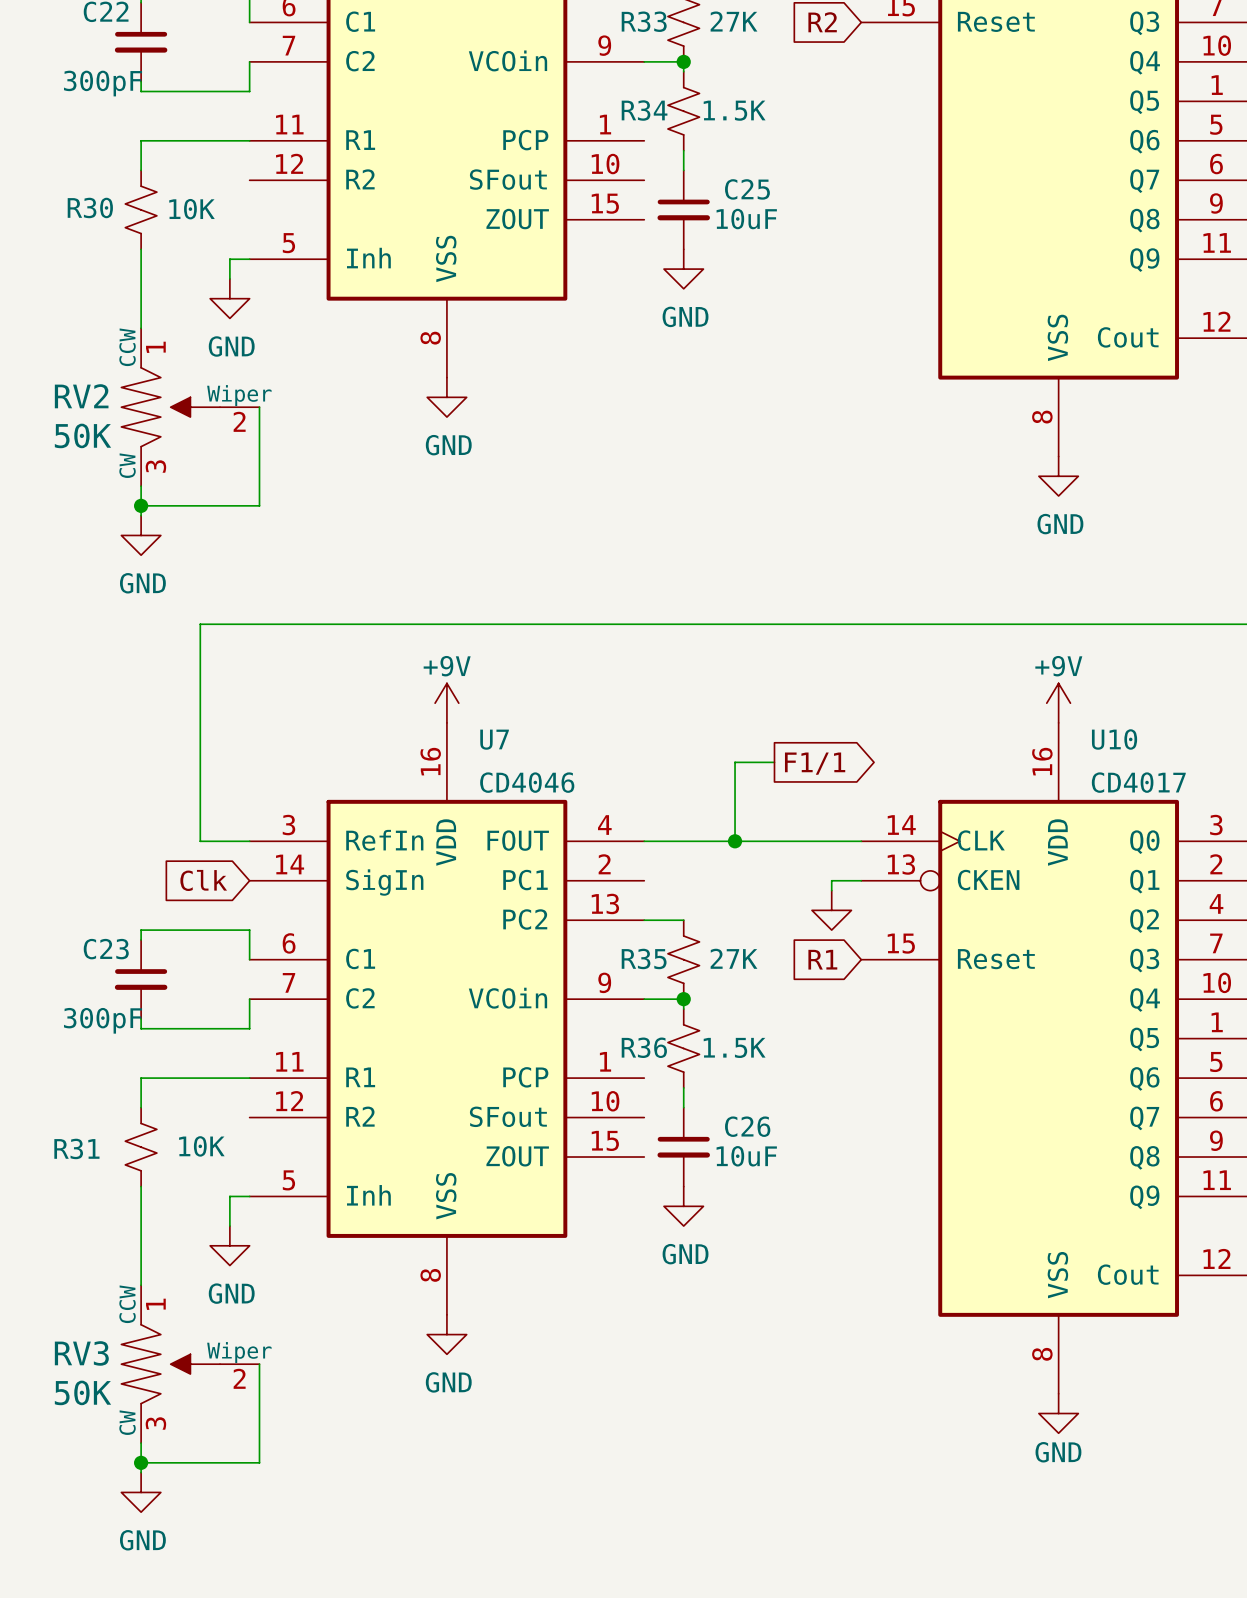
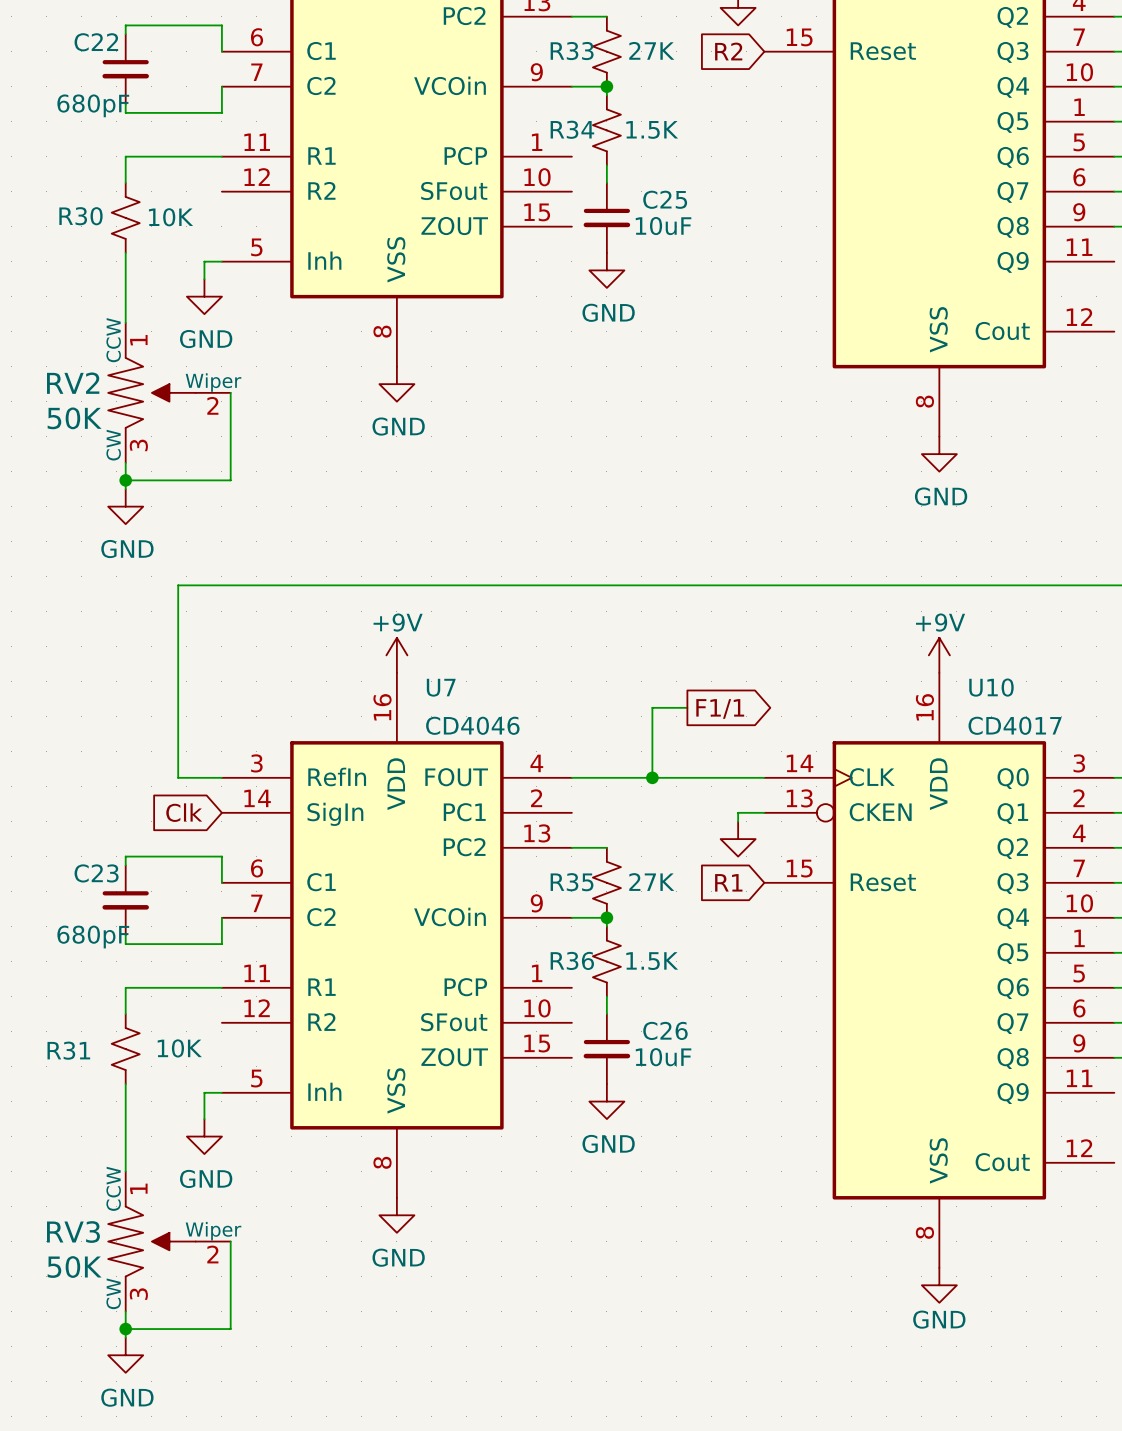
C22 value: 300pF (103, 83) -> 680pF (93, 105)
C23 value: 300pF (103, 1020) -> 680pF (93, 937)

